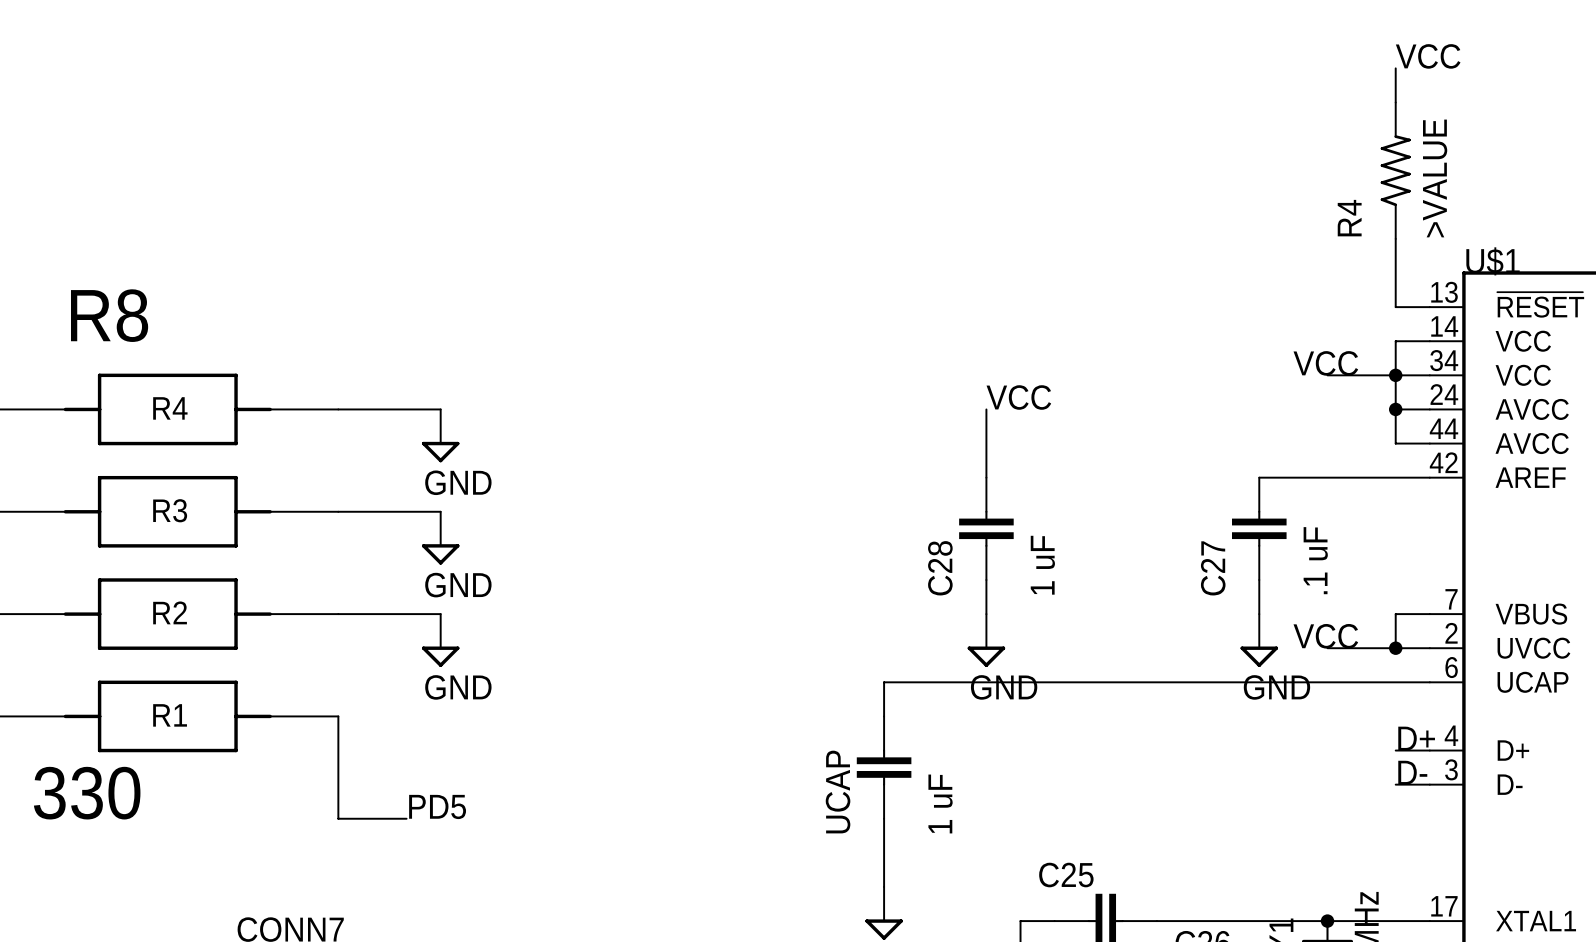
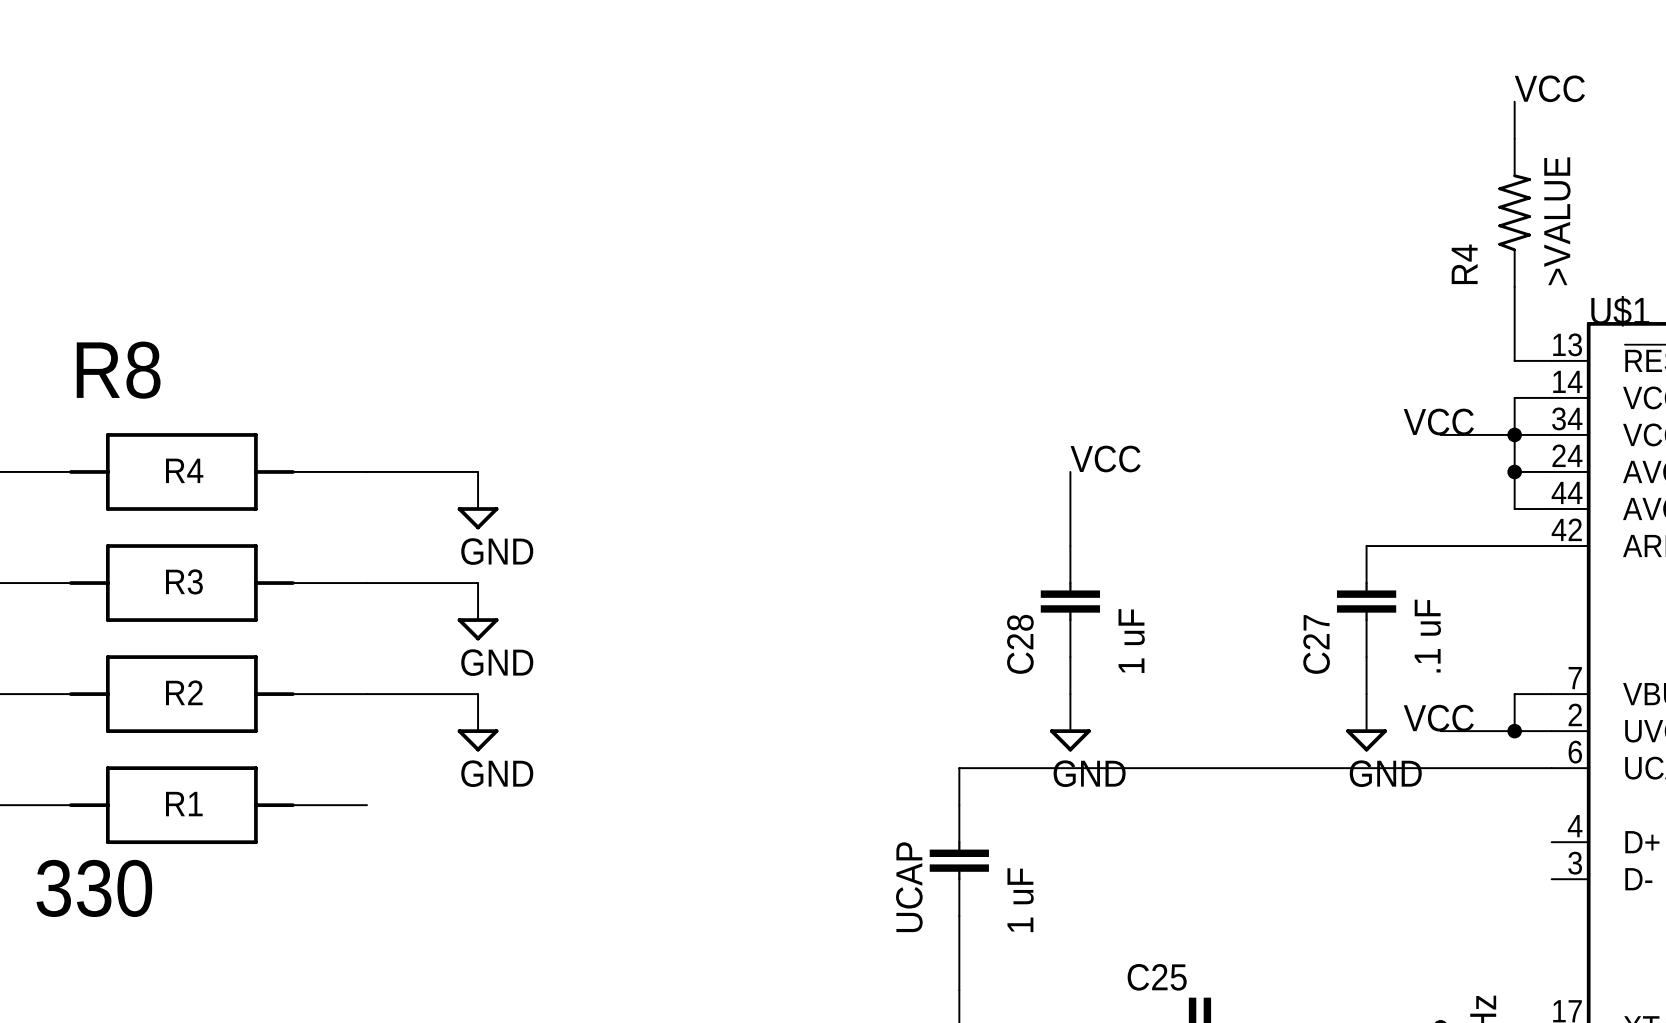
wire: (338, 716) (338, 818) (406, 818) -> none
label: D+ (1416, 738) -> none
wire: (1395, 750) (1429, 750) -> none
label: D- (1412, 772) -> none
wire: (1395, 784) (1429, 784) -> none
label: PD5 (437, 806) -> none

